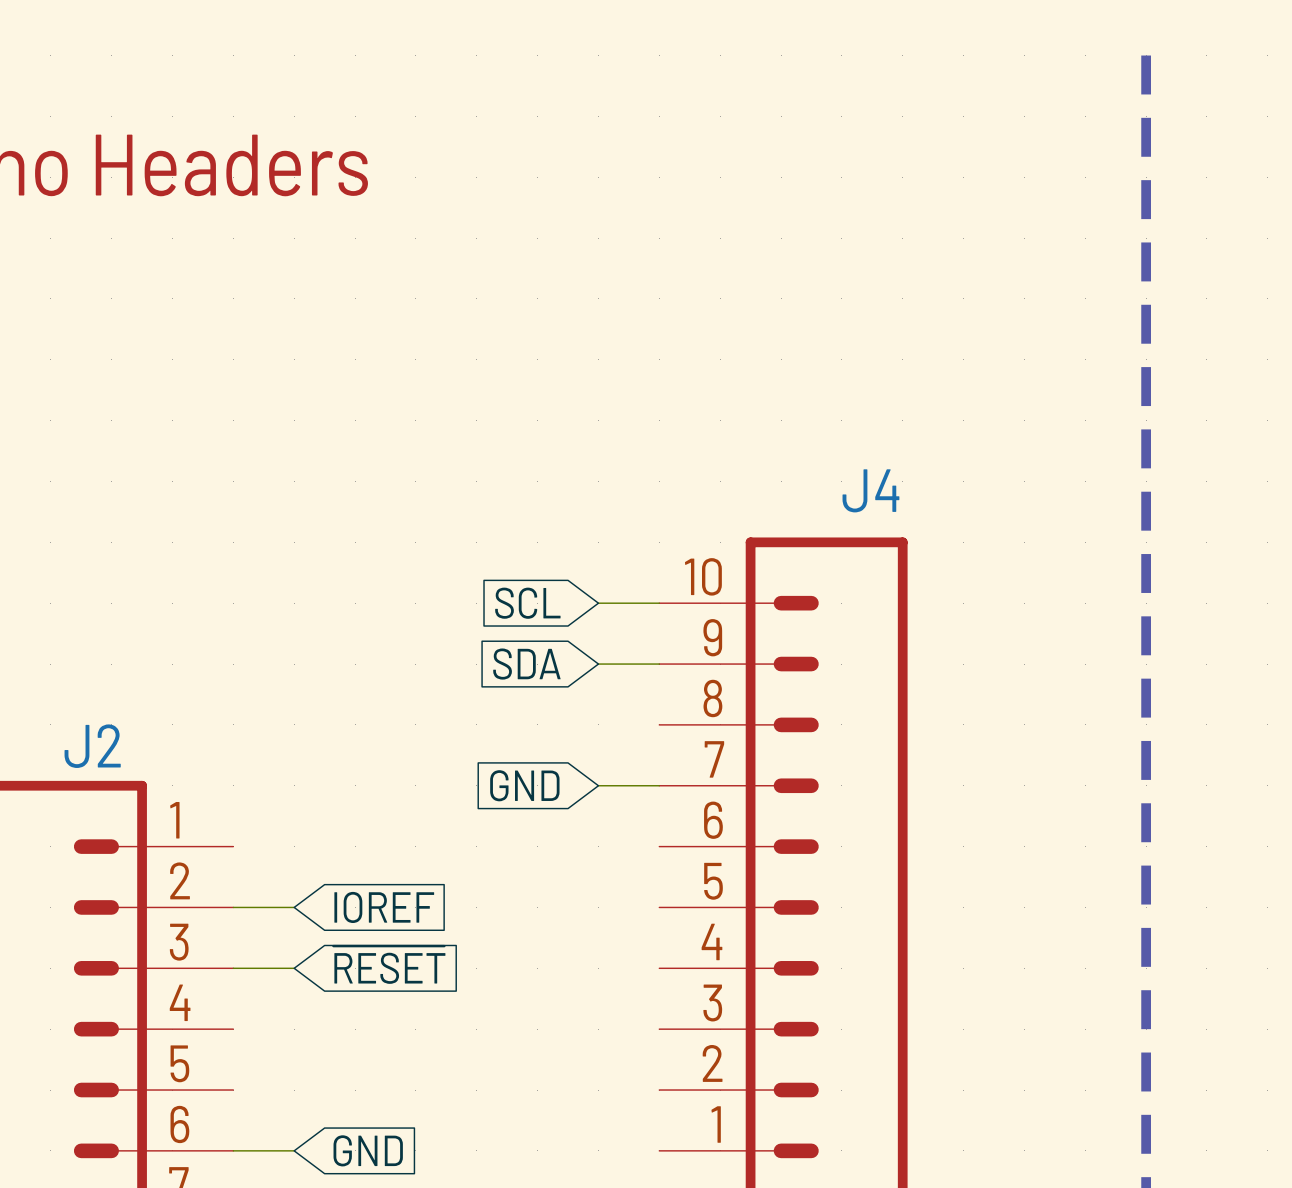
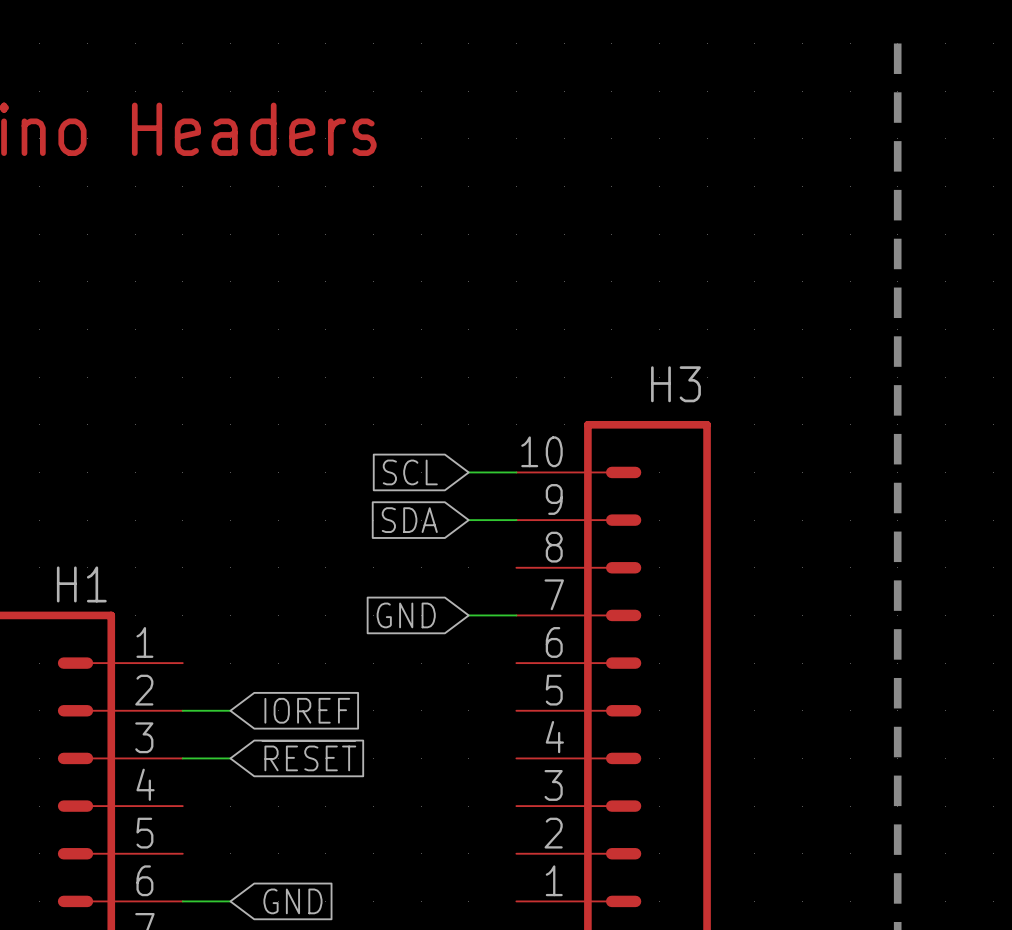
J4 name: J4 (870, 490) -> H3 (675, 384)
J2 name: J2 (92, 746) -> H1 (81, 584)

